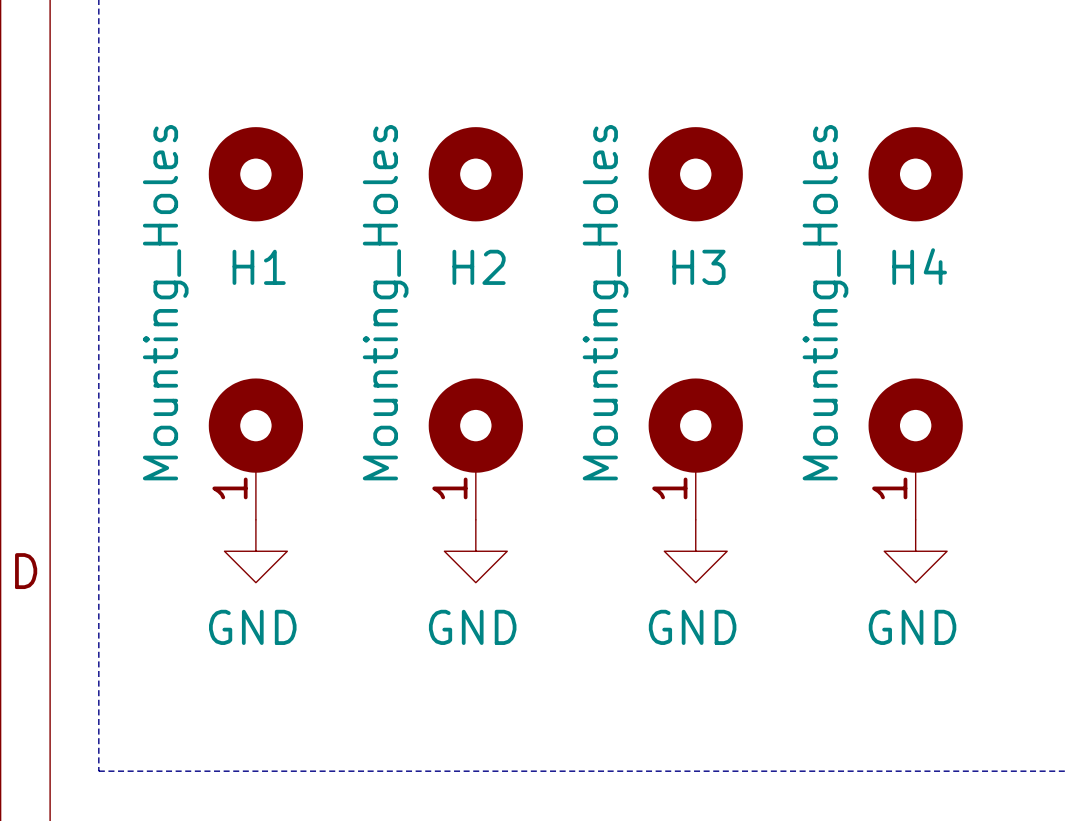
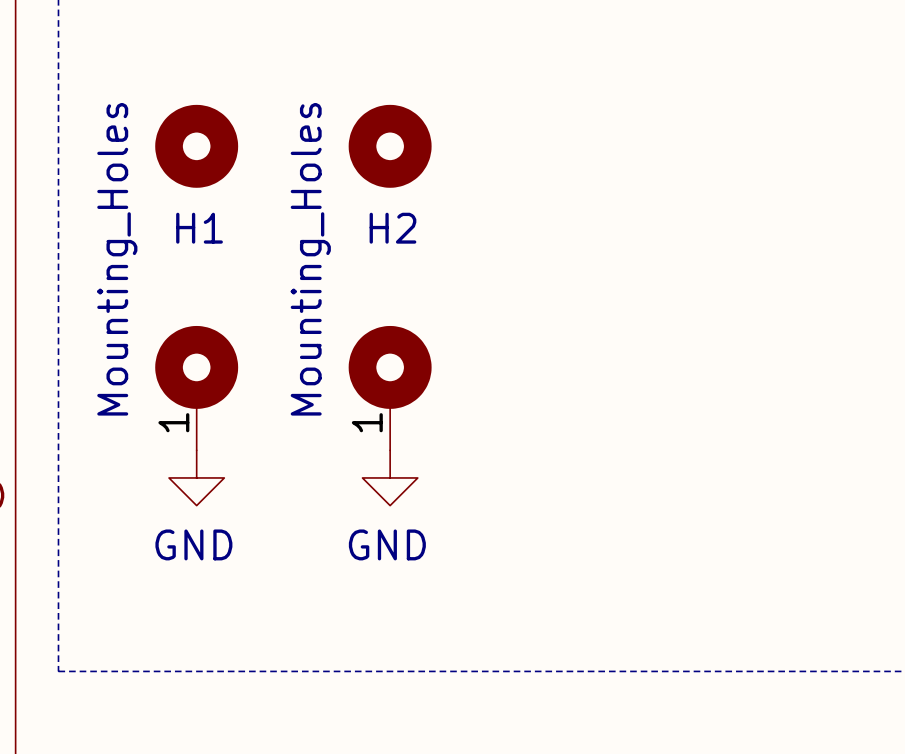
H3: Mounting_Holes (695, 323) -> none
H4: Mounting_Holes (915, 323) -> none
power symbol: GND (695, 551) -> none
power symbol: GND (915, 551) -> none

